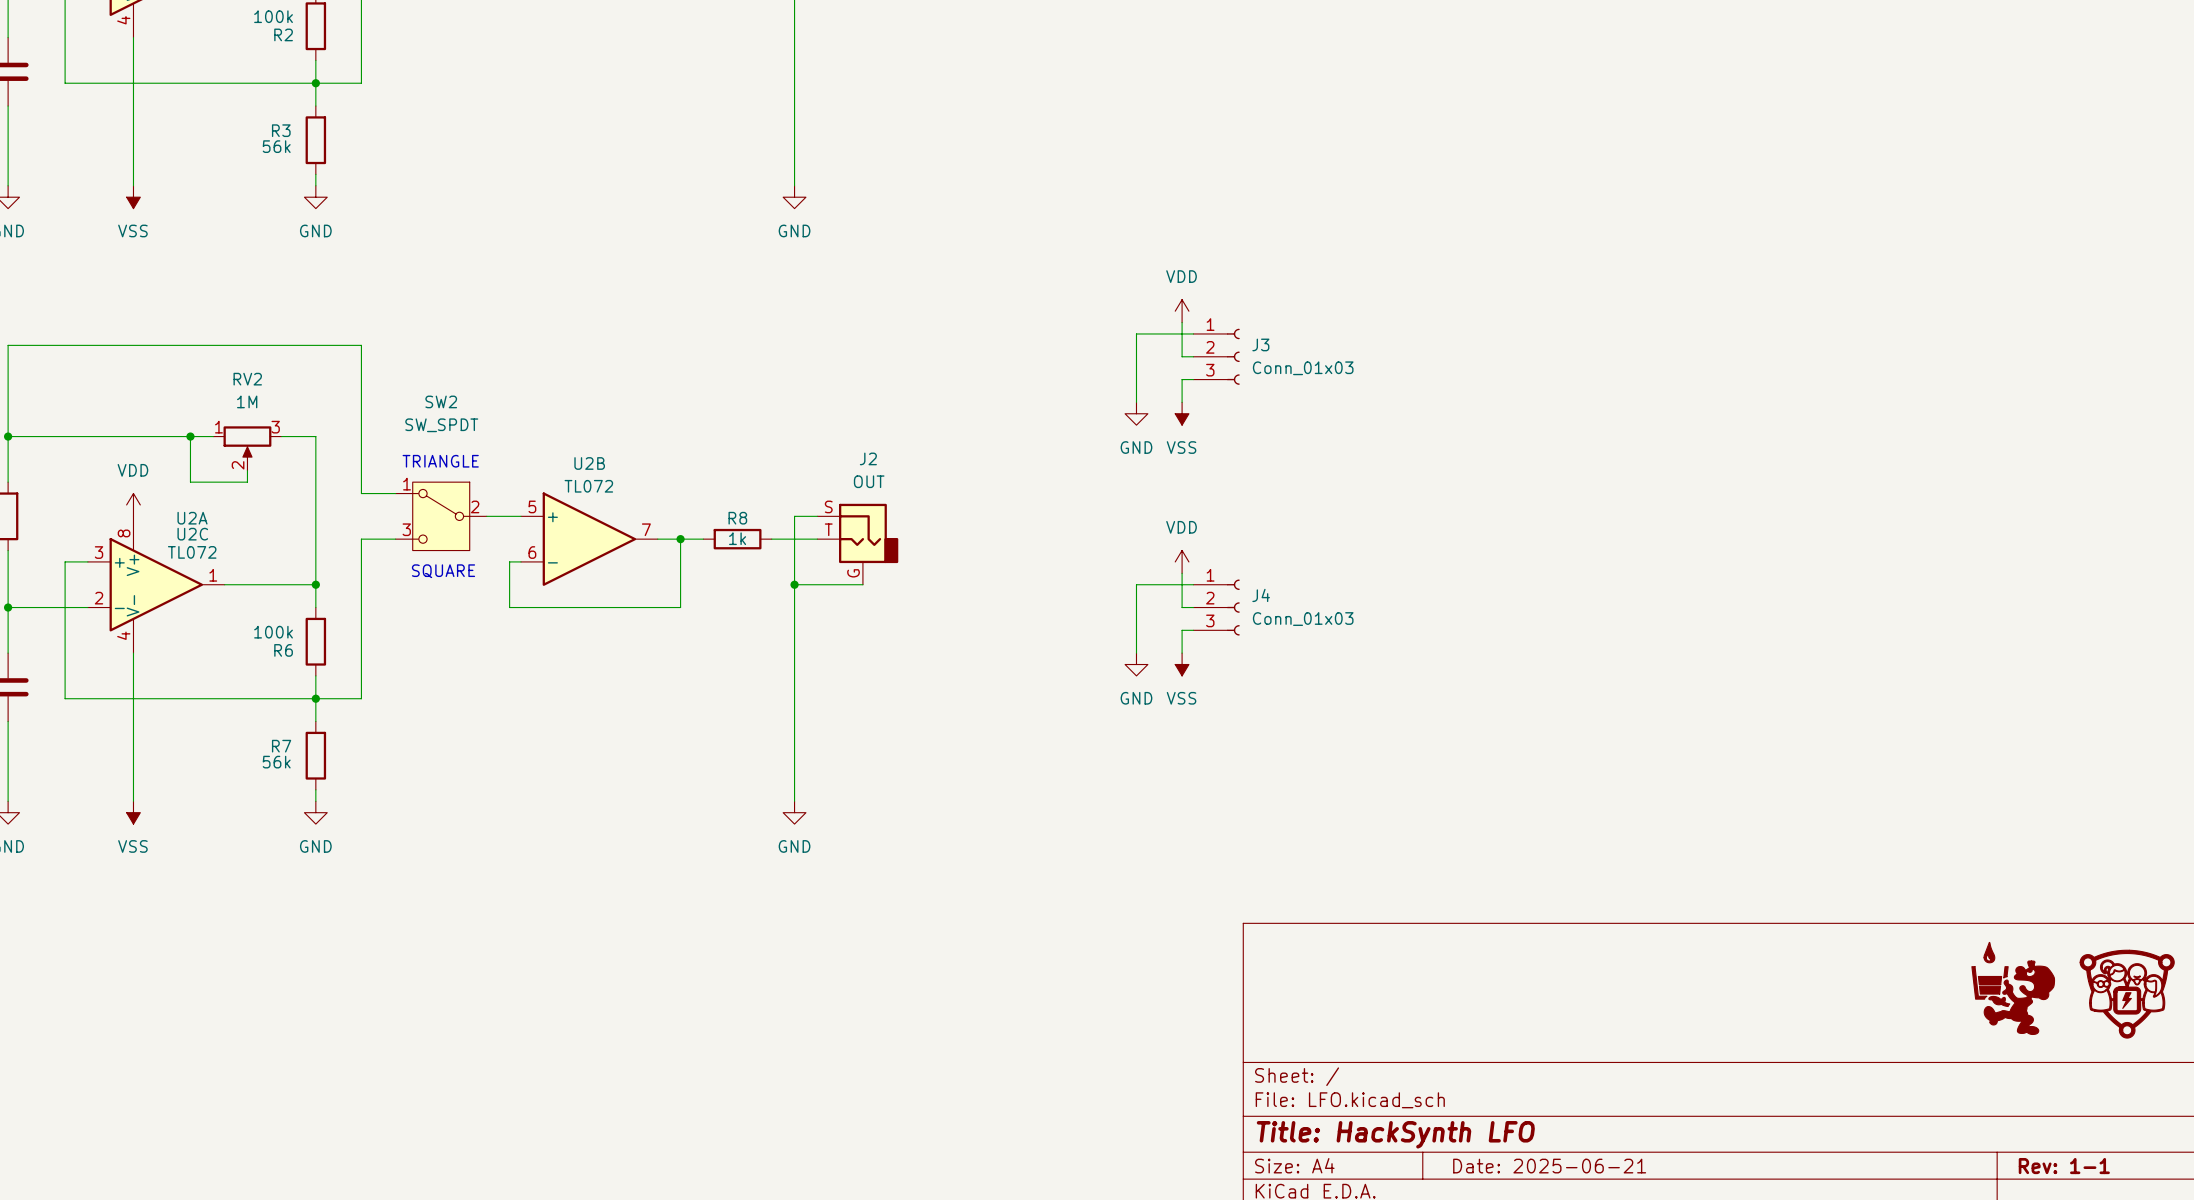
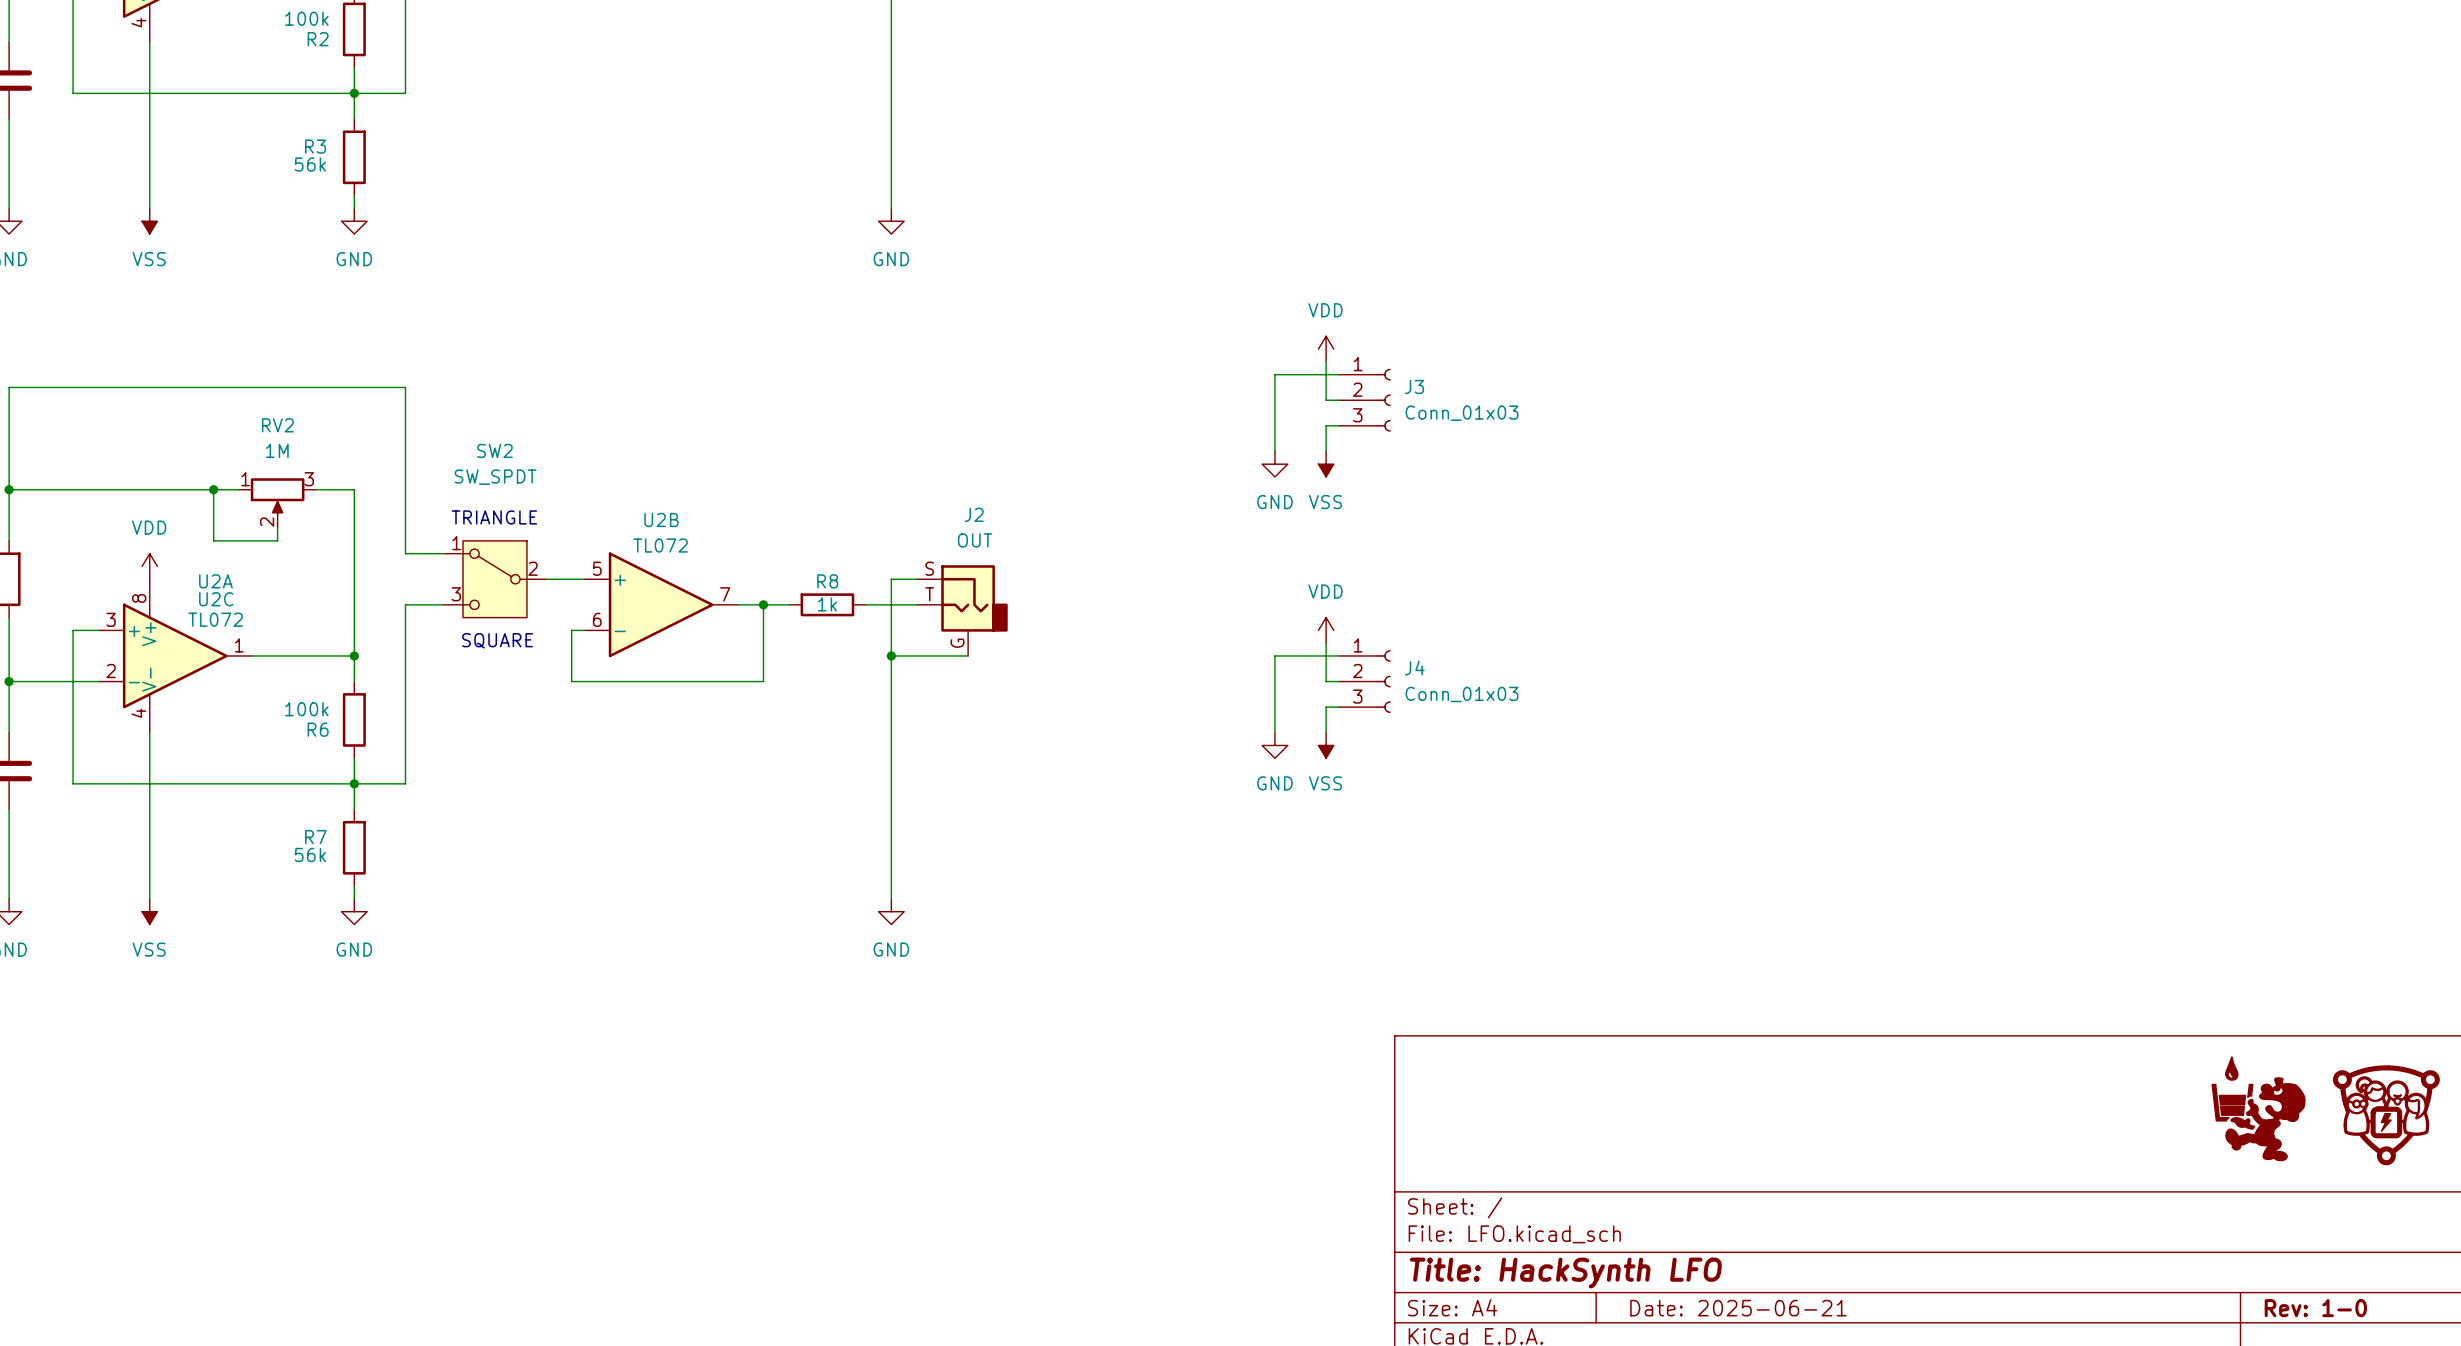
title block: Rev: 1-1 (2064, 1166) -> Rev: 1-0 (2315, 1308)

